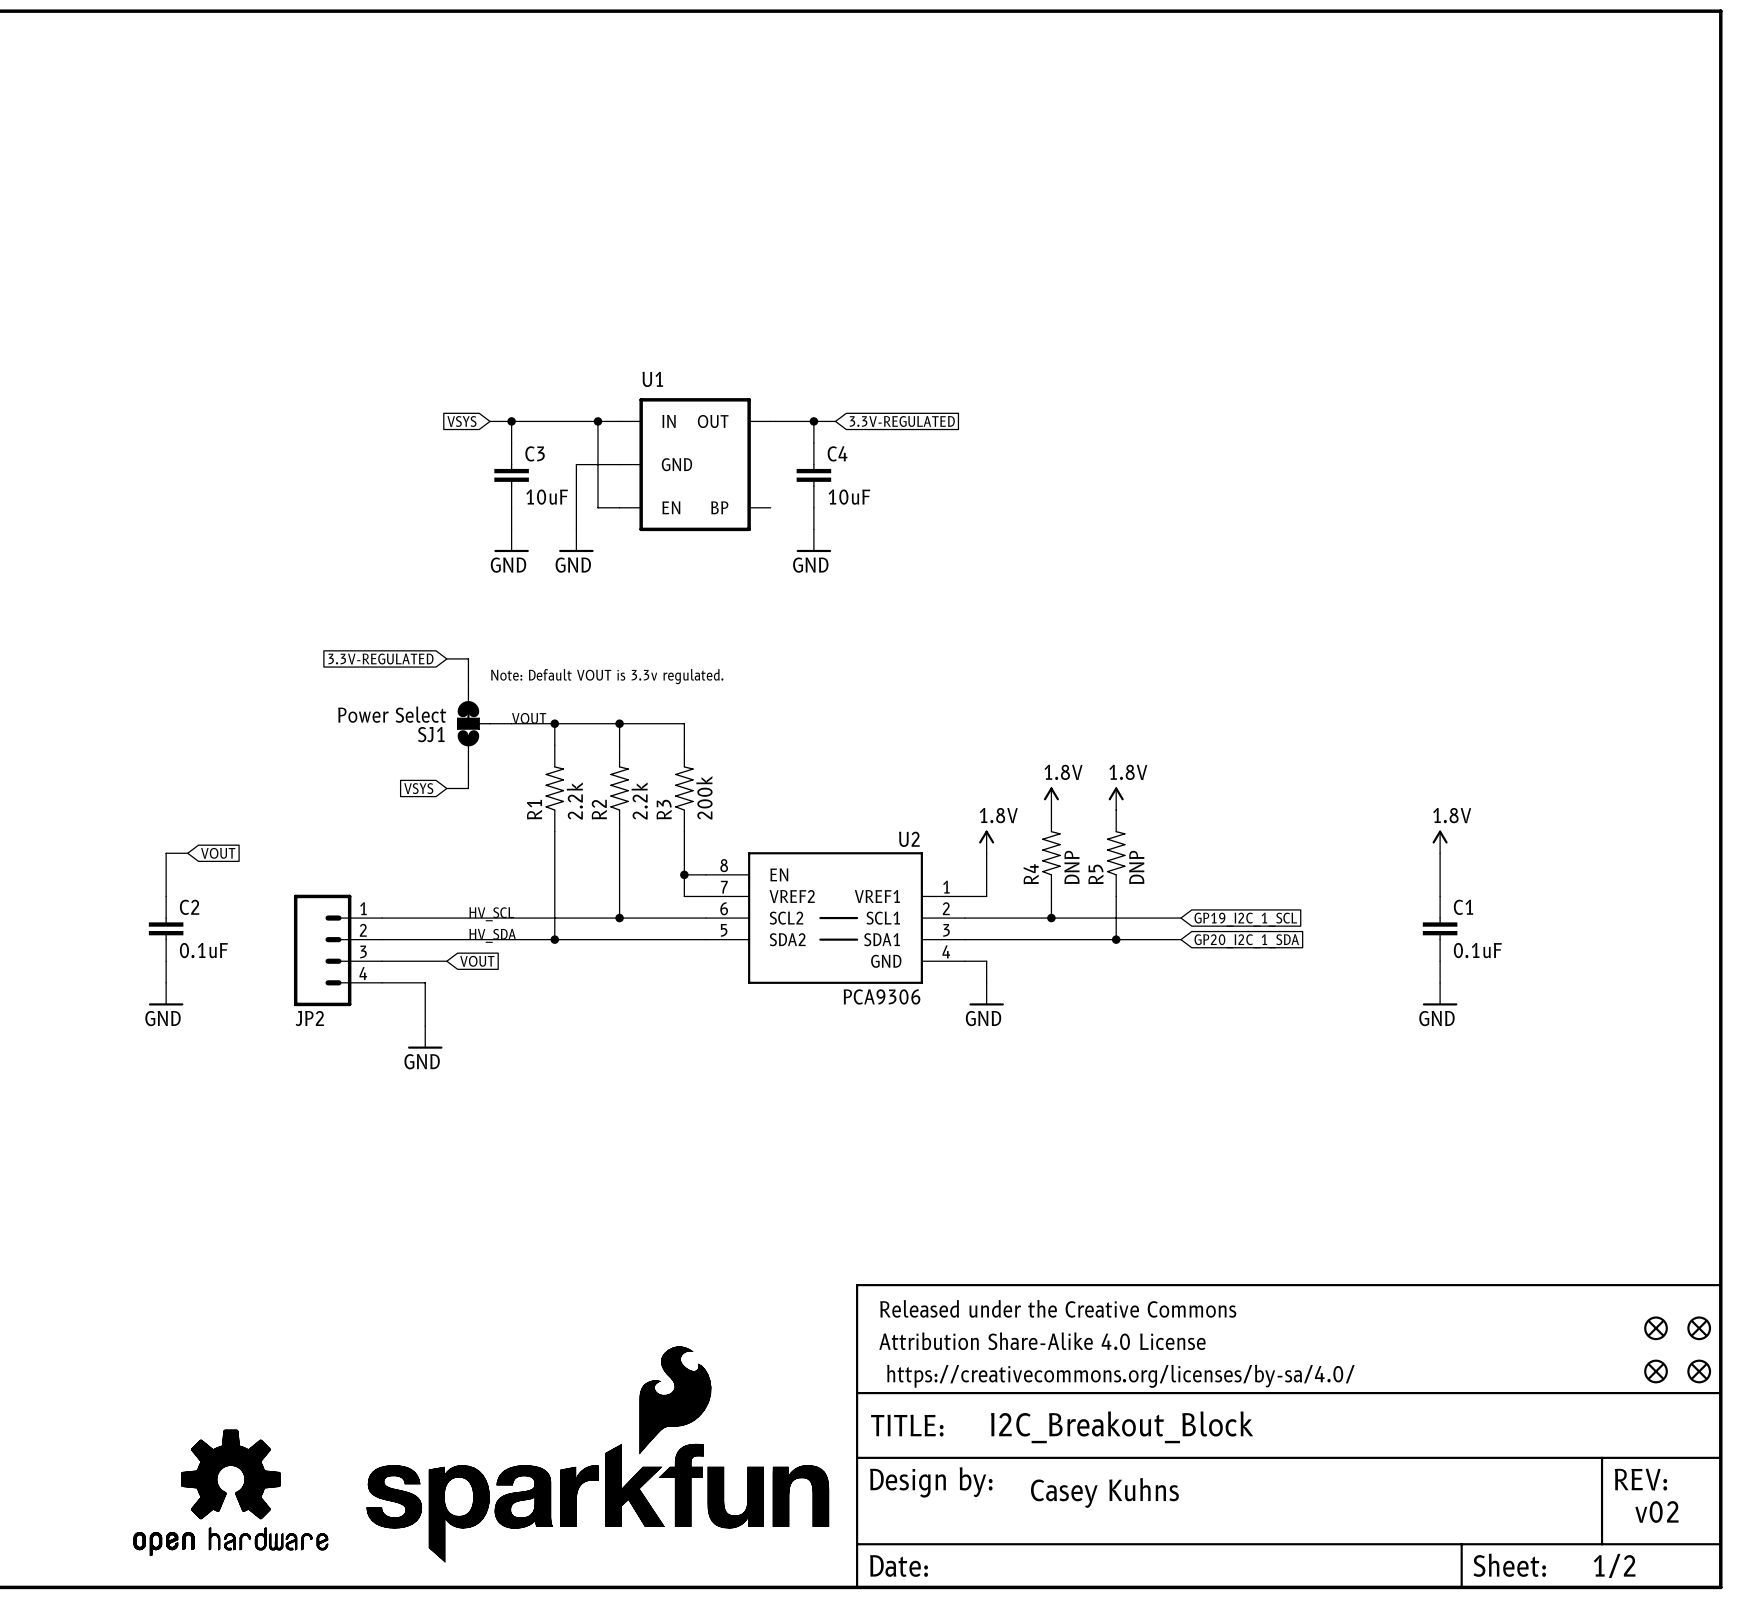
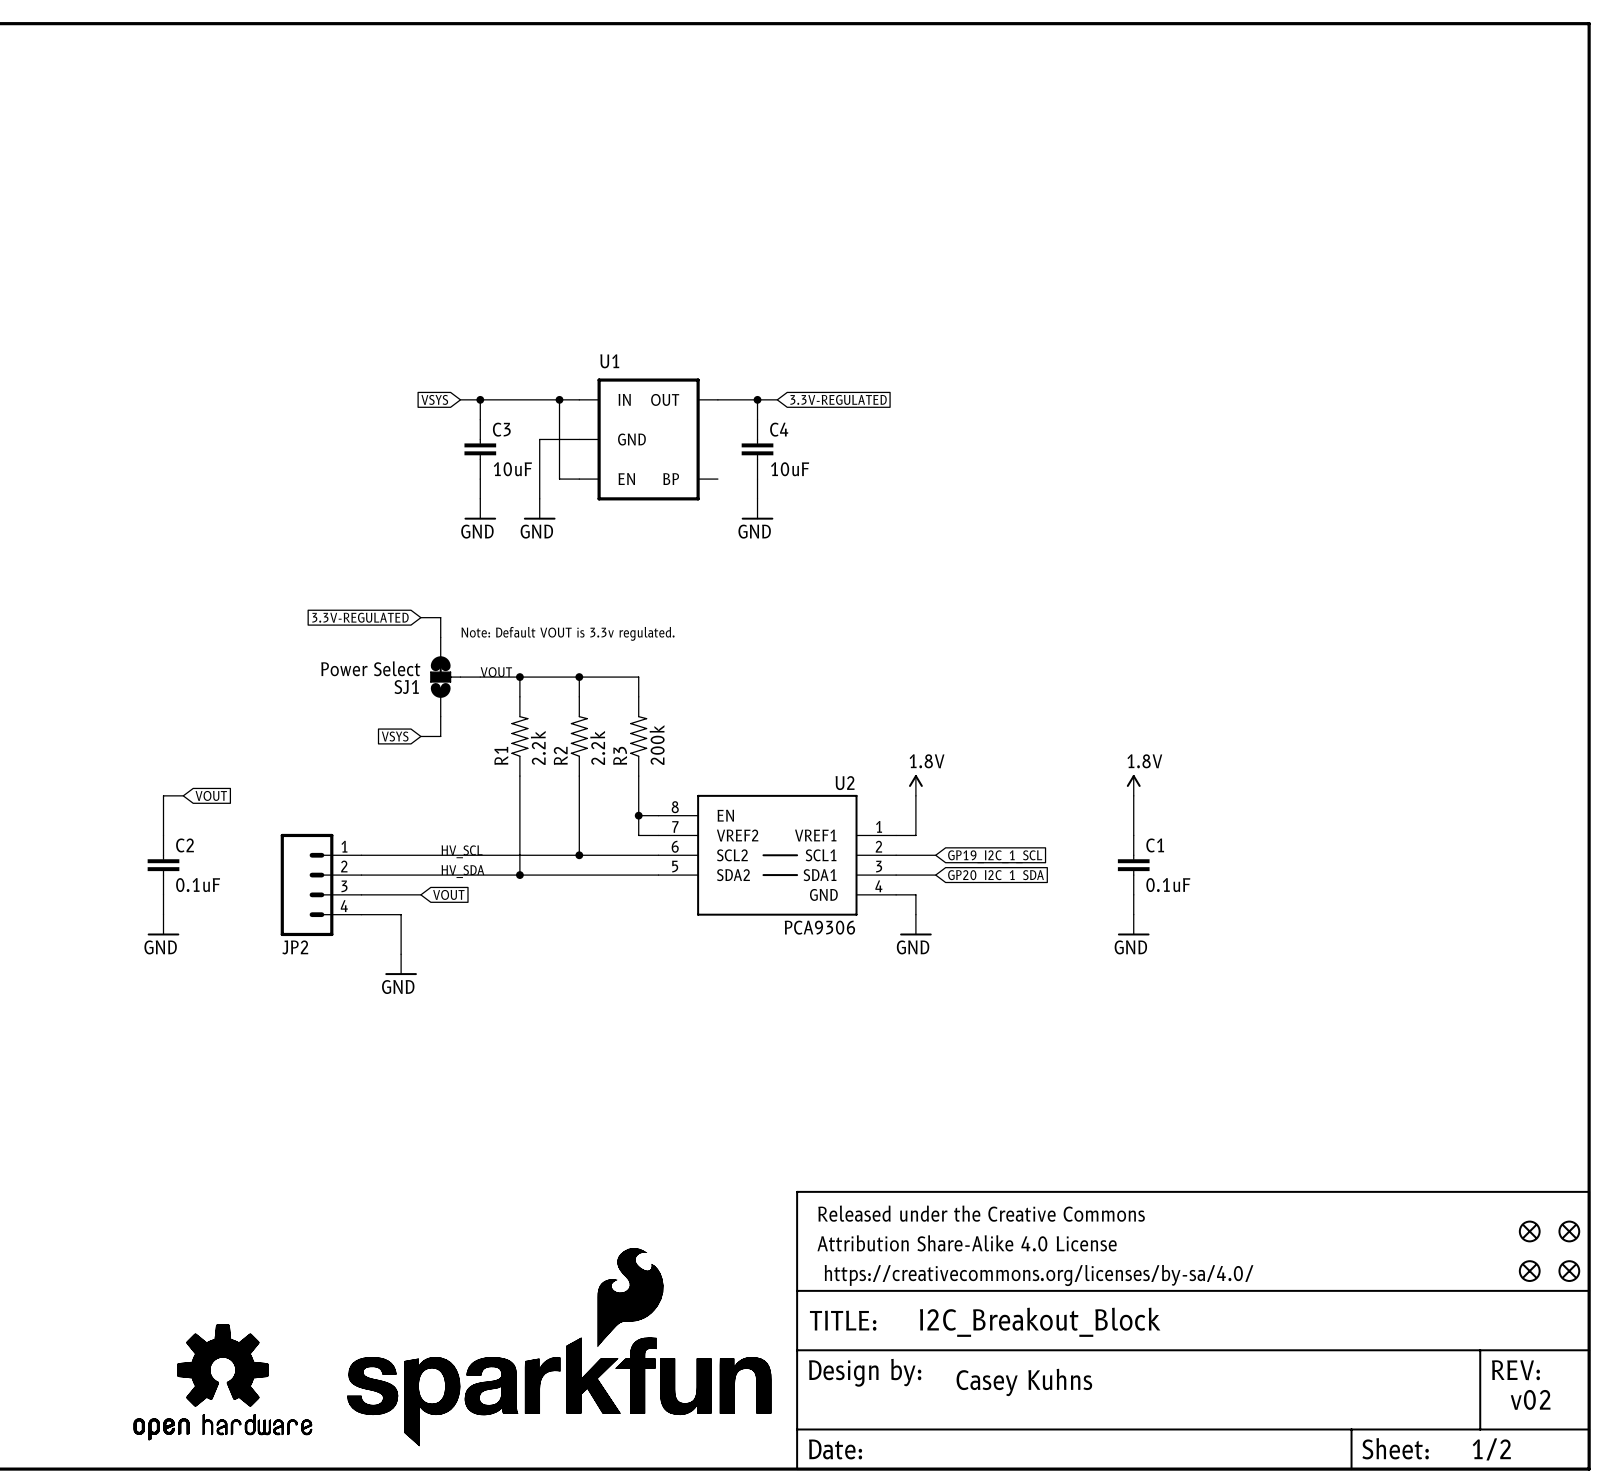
power symbol: 1.8V (1051, 798) -> none
power symbol: 1.8V (1116, 798) -> none
power symbol: none -> 1.8V (1133, 785)
power symbol: 1.8V (1440, 841) -> none
R4: DNP (1051, 853) -> none
R5: DNP (1116, 853) -> none
wire: (1440, 853) (1440, 896) -> none
wire: (1051, 896) (1051, 918) -> (1133, 894) (1133, 914)
wire: (1116, 896) (1116, 939) -> (1133, 795) (1133, 835)
wire: (1008, 918) (1180, 918) -> none
junction: (1051, 918) -> none
global label position: GP19_I2C_1_SCL (1245, 919) -> GP19_I2C_1_SCL (995, 856)
C1 position: (1440, 928) -> (1133, 865)
wire: (1008, 939) (1180, 939) -> none
junction: (1116, 939) -> none
global label position: GP20_I2C_1_SDA (1246, 941) -> GP20_I2C_1_SDA (996, 876)
wire: (1440, 961) (1440, 982) -> none
power symbol: none -> GND (1133, 925)
power symbol: GND (1440, 994) -> none

